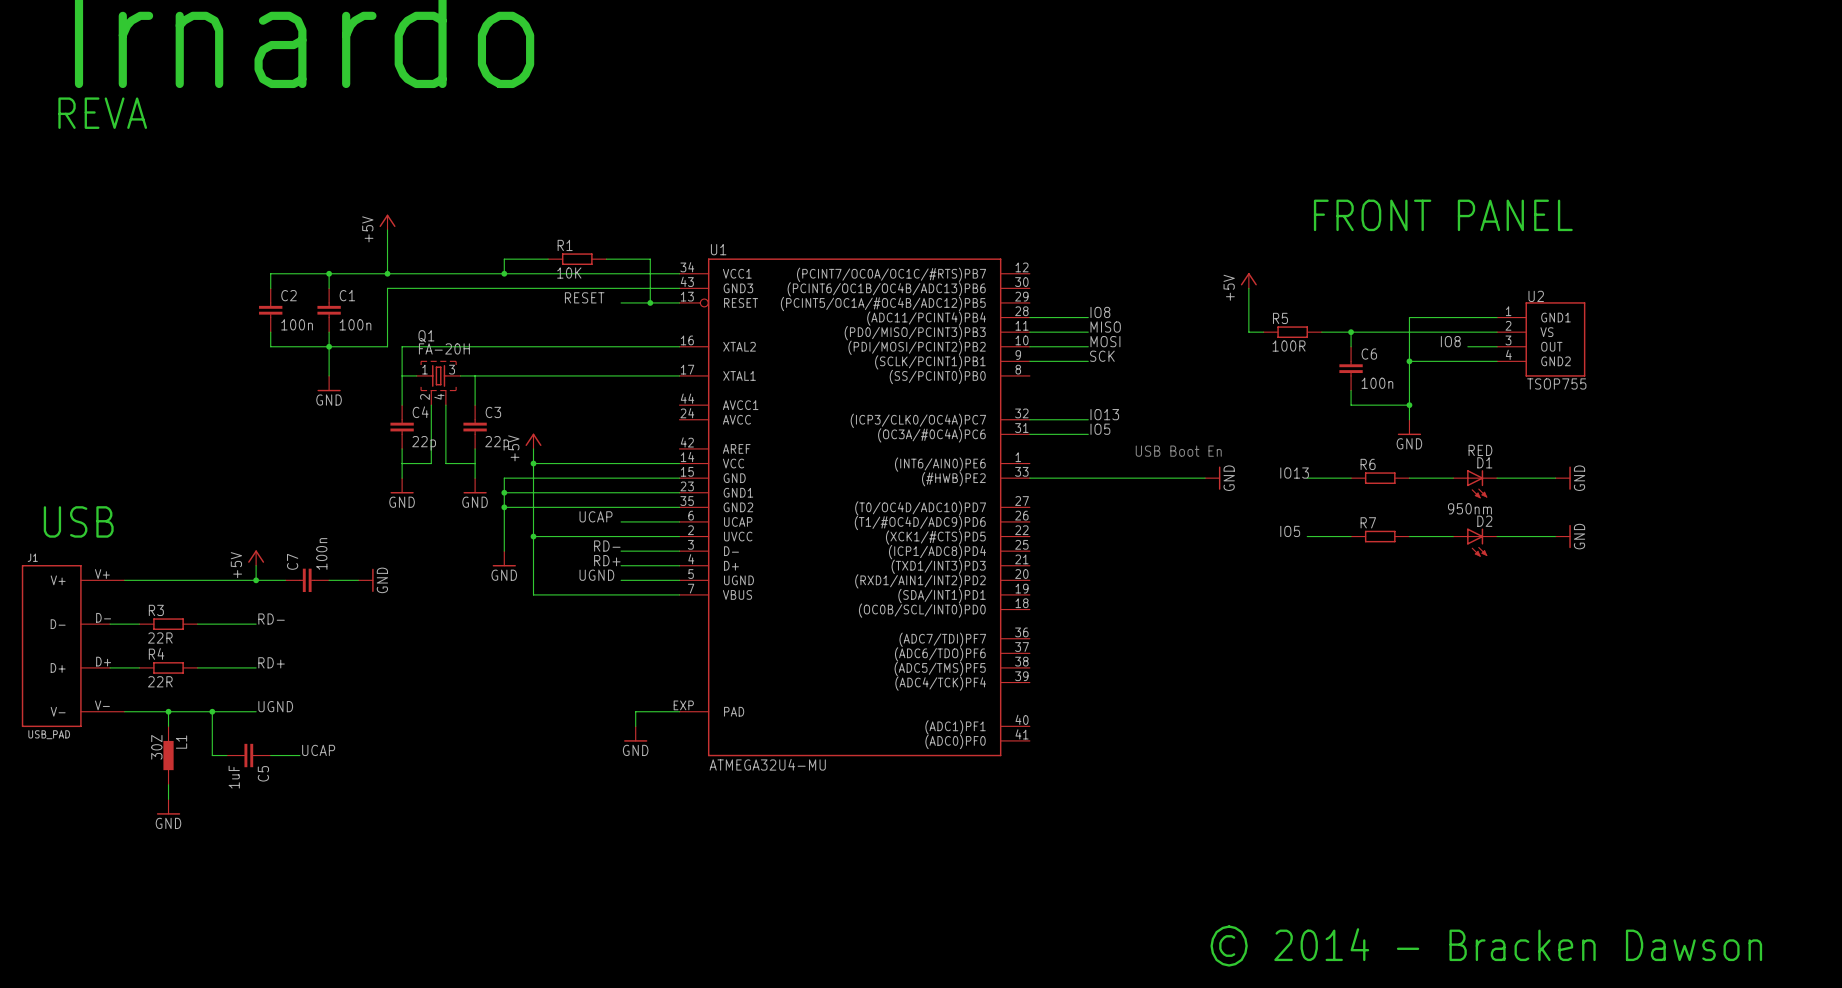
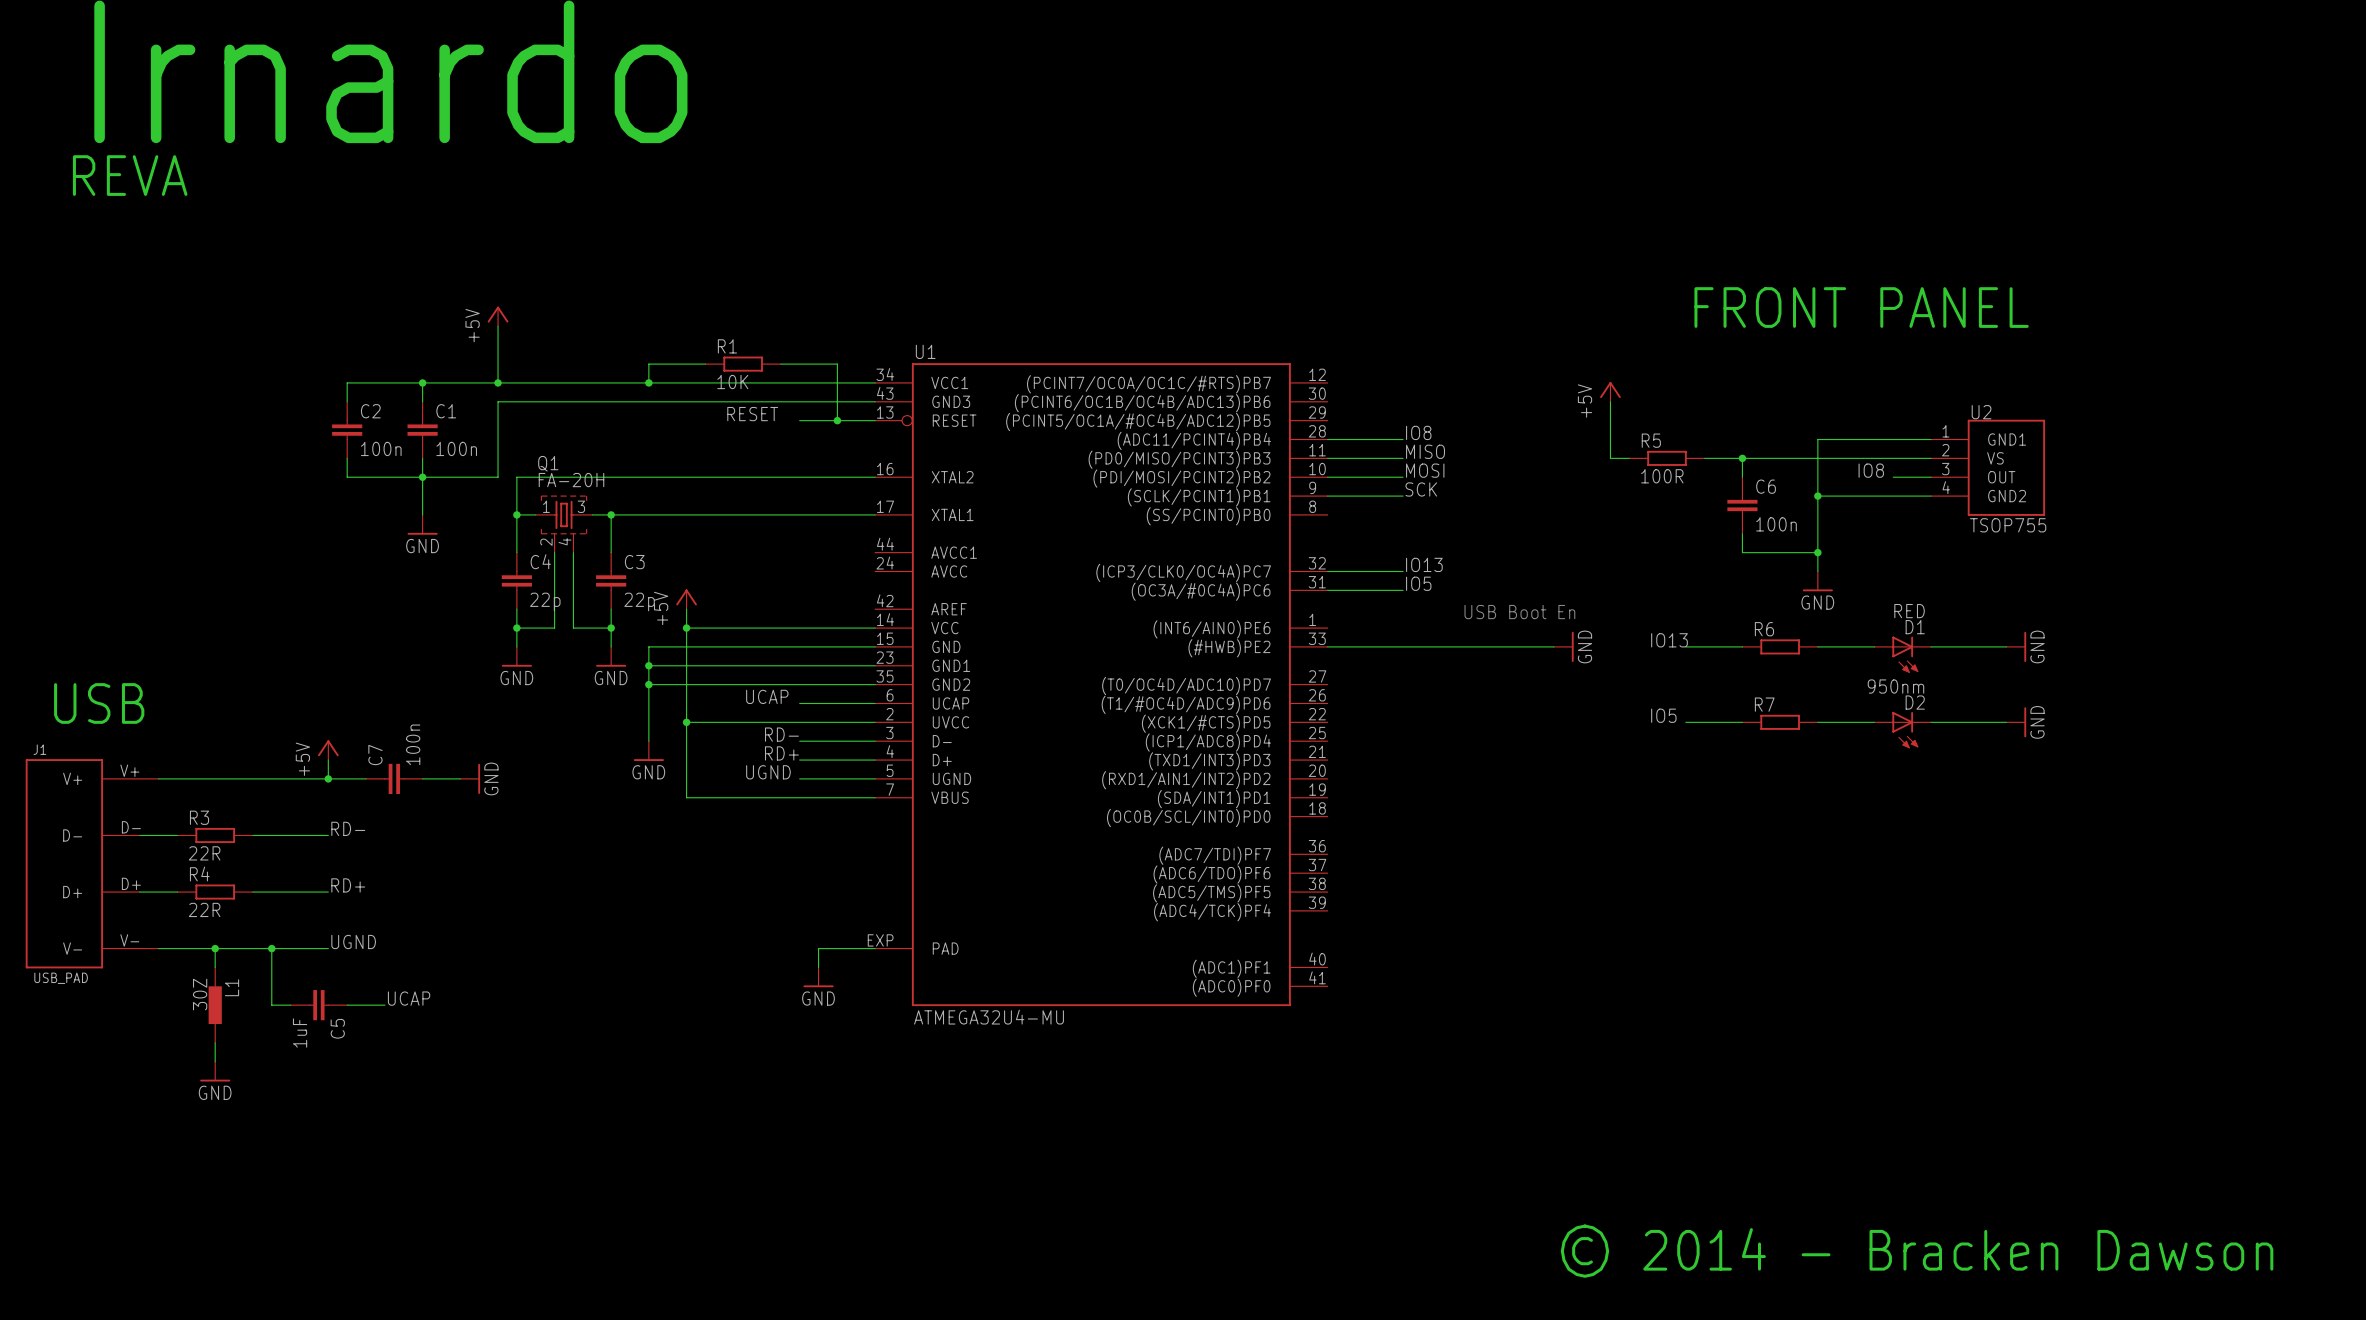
junction: none -> (516, 514)
junction: none -> (611, 514)
junction: none -> (516, 628)
junction: none -> (611, 628)

